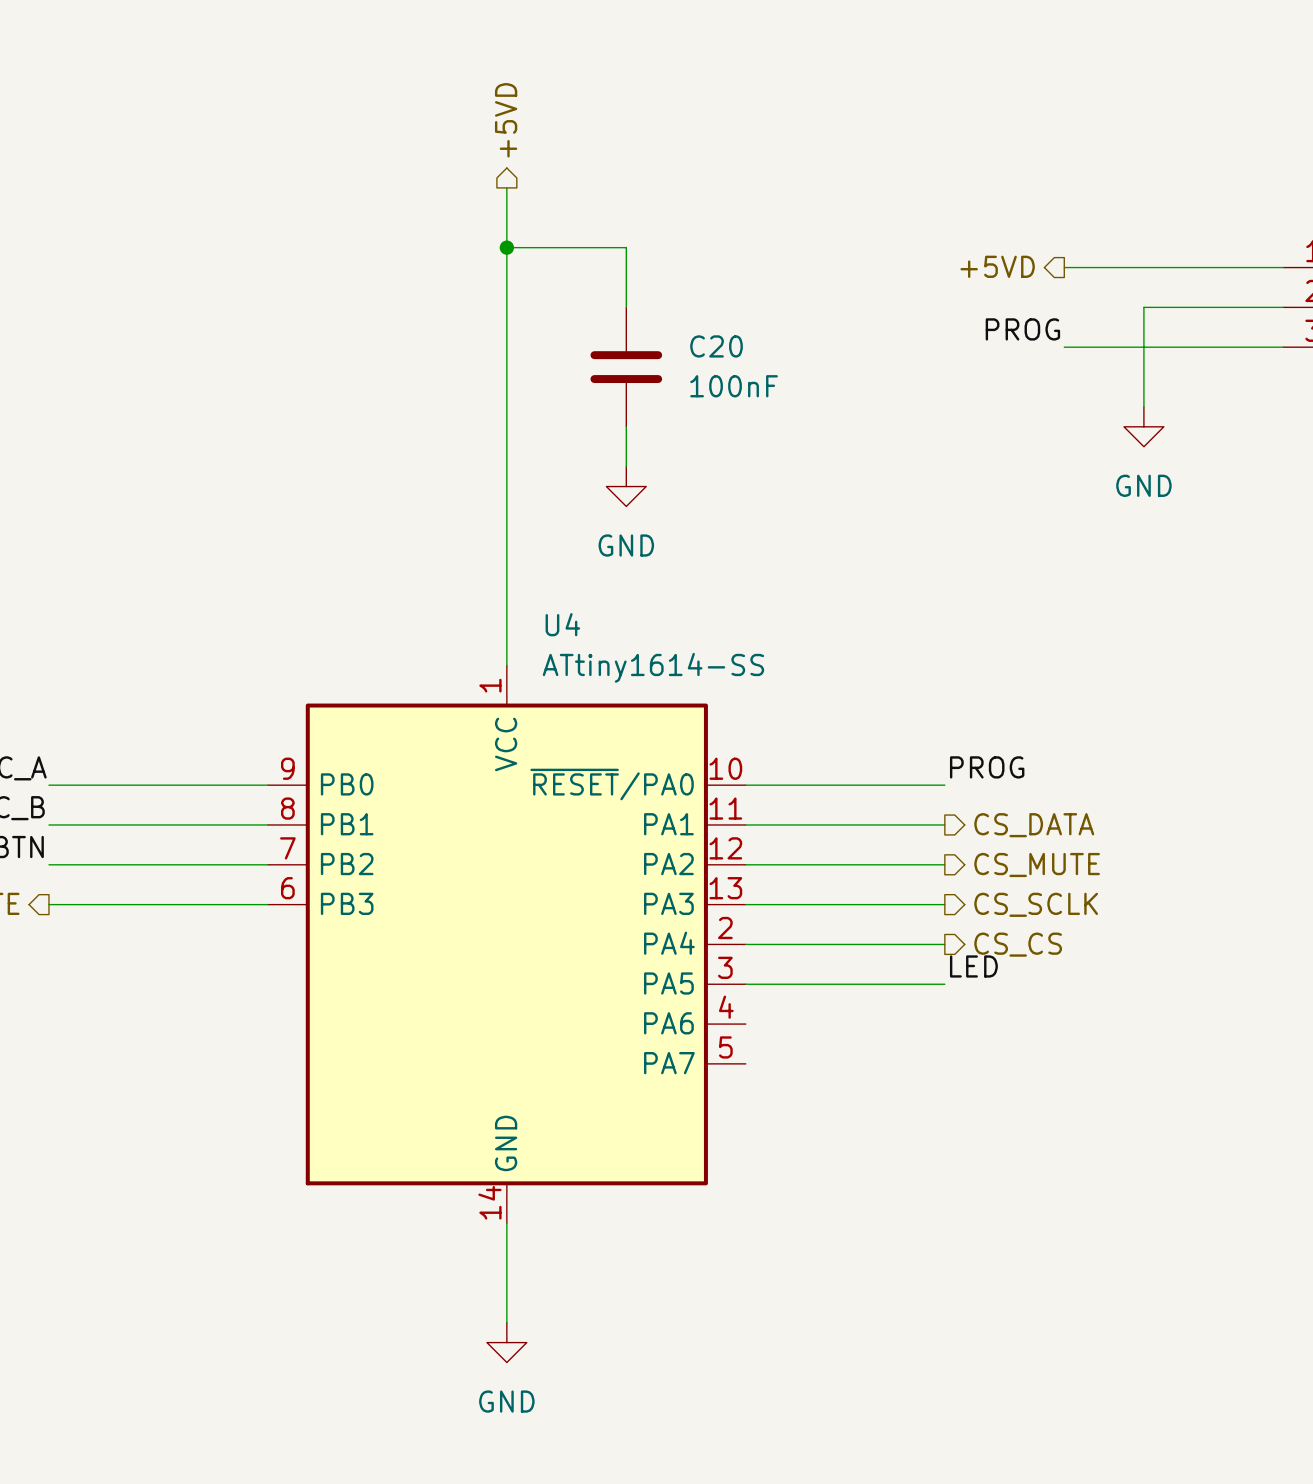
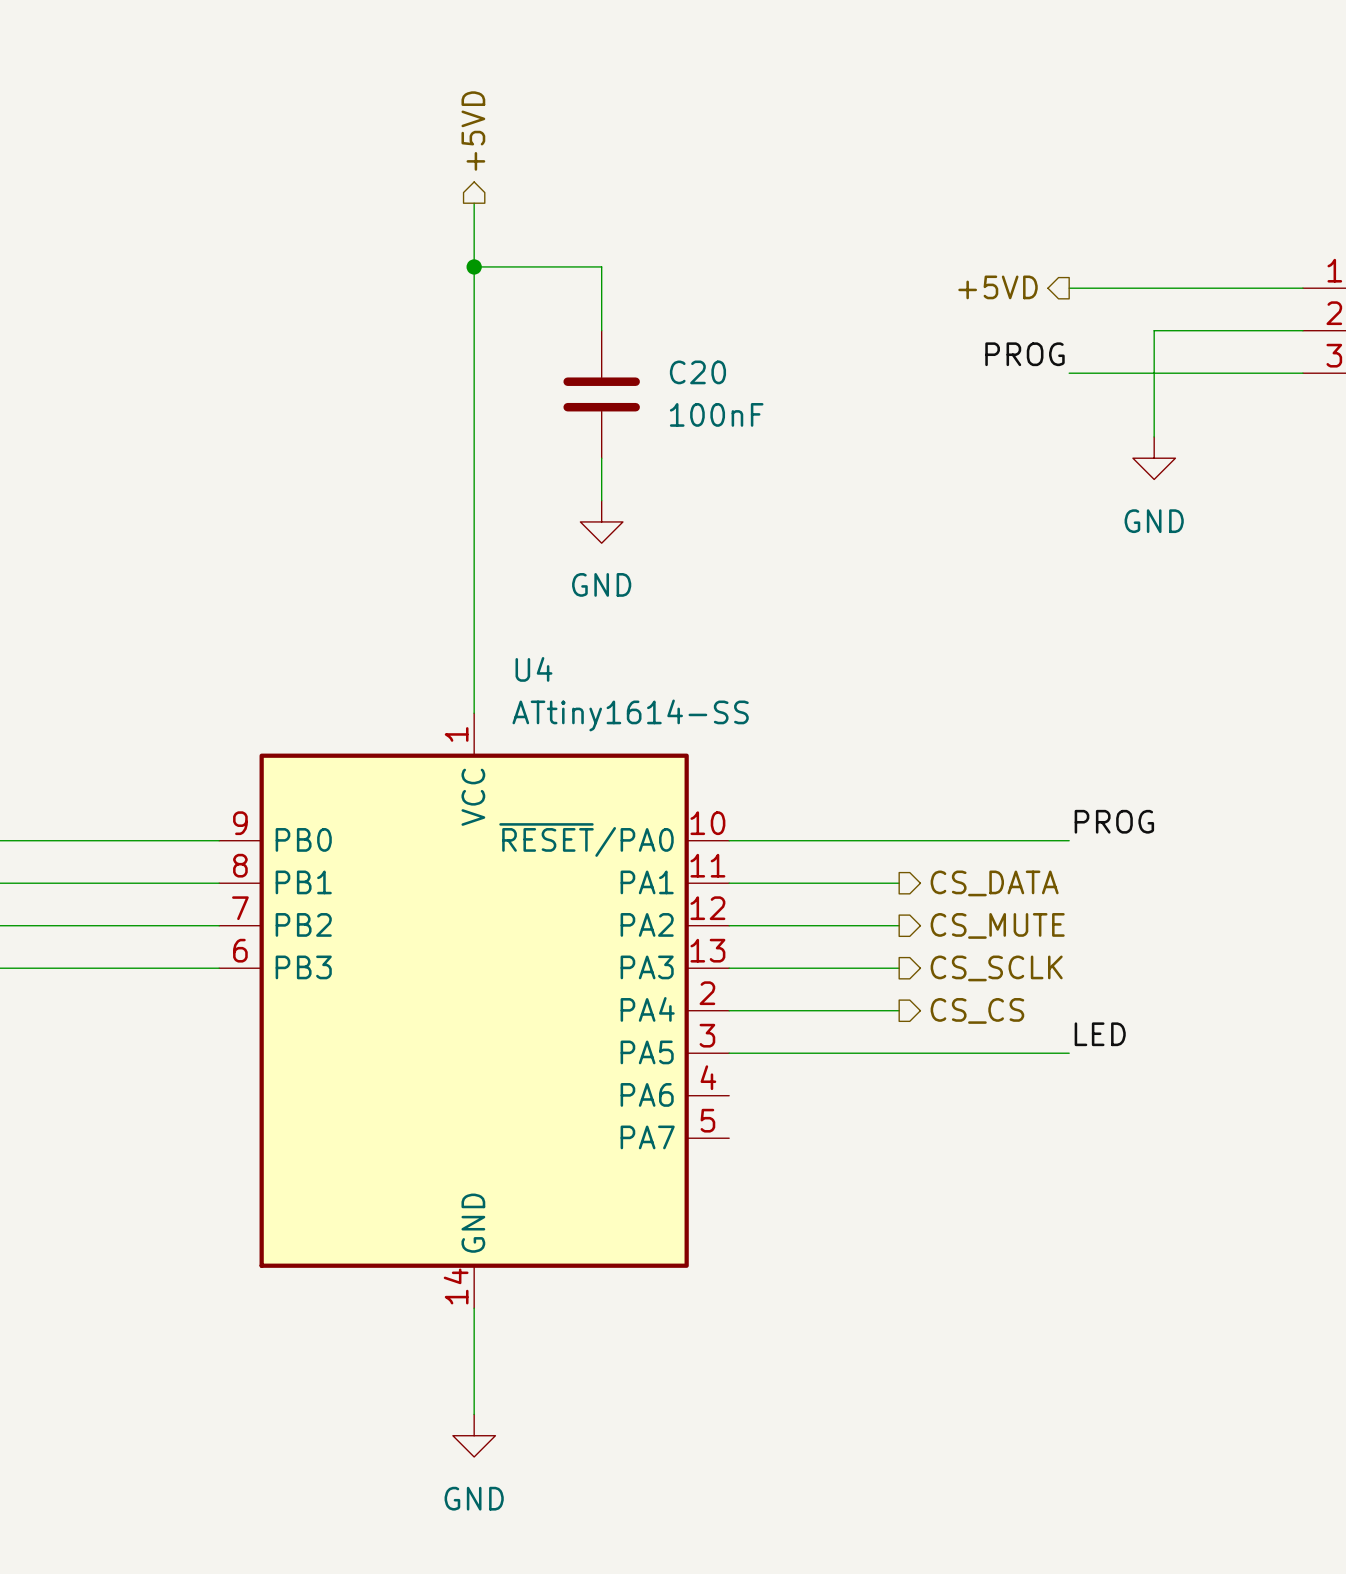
label position: PROG (987, 767) -> PROG (1114, 821)
wire: none -> (941, 840) (1069, 840)
wire: (905, 824) (944, 824) -> none
hierarchical label position: CS_DATA (1034, 825) -> CS_DATA (994, 883)
wire: (905, 864) (944, 864) -> none
hierarchical label position: CS_MUTE (1037, 865) -> CS_MUTE (997, 925)
wire: (905, 904) (944, 904) -> none
hierarchical label position: CS_SCLK (1036, 904) -> CS_SCLK (996, 968)
wire: (905, 944) (944, 944) -> none
hierarchical label position: CS_CS (1018, 944) -> CS_CS (977, 1010)
label position: LED (973, 966) -> LED (1100, 1034)
wire: none -> (941, 1053) (1069, 1053)

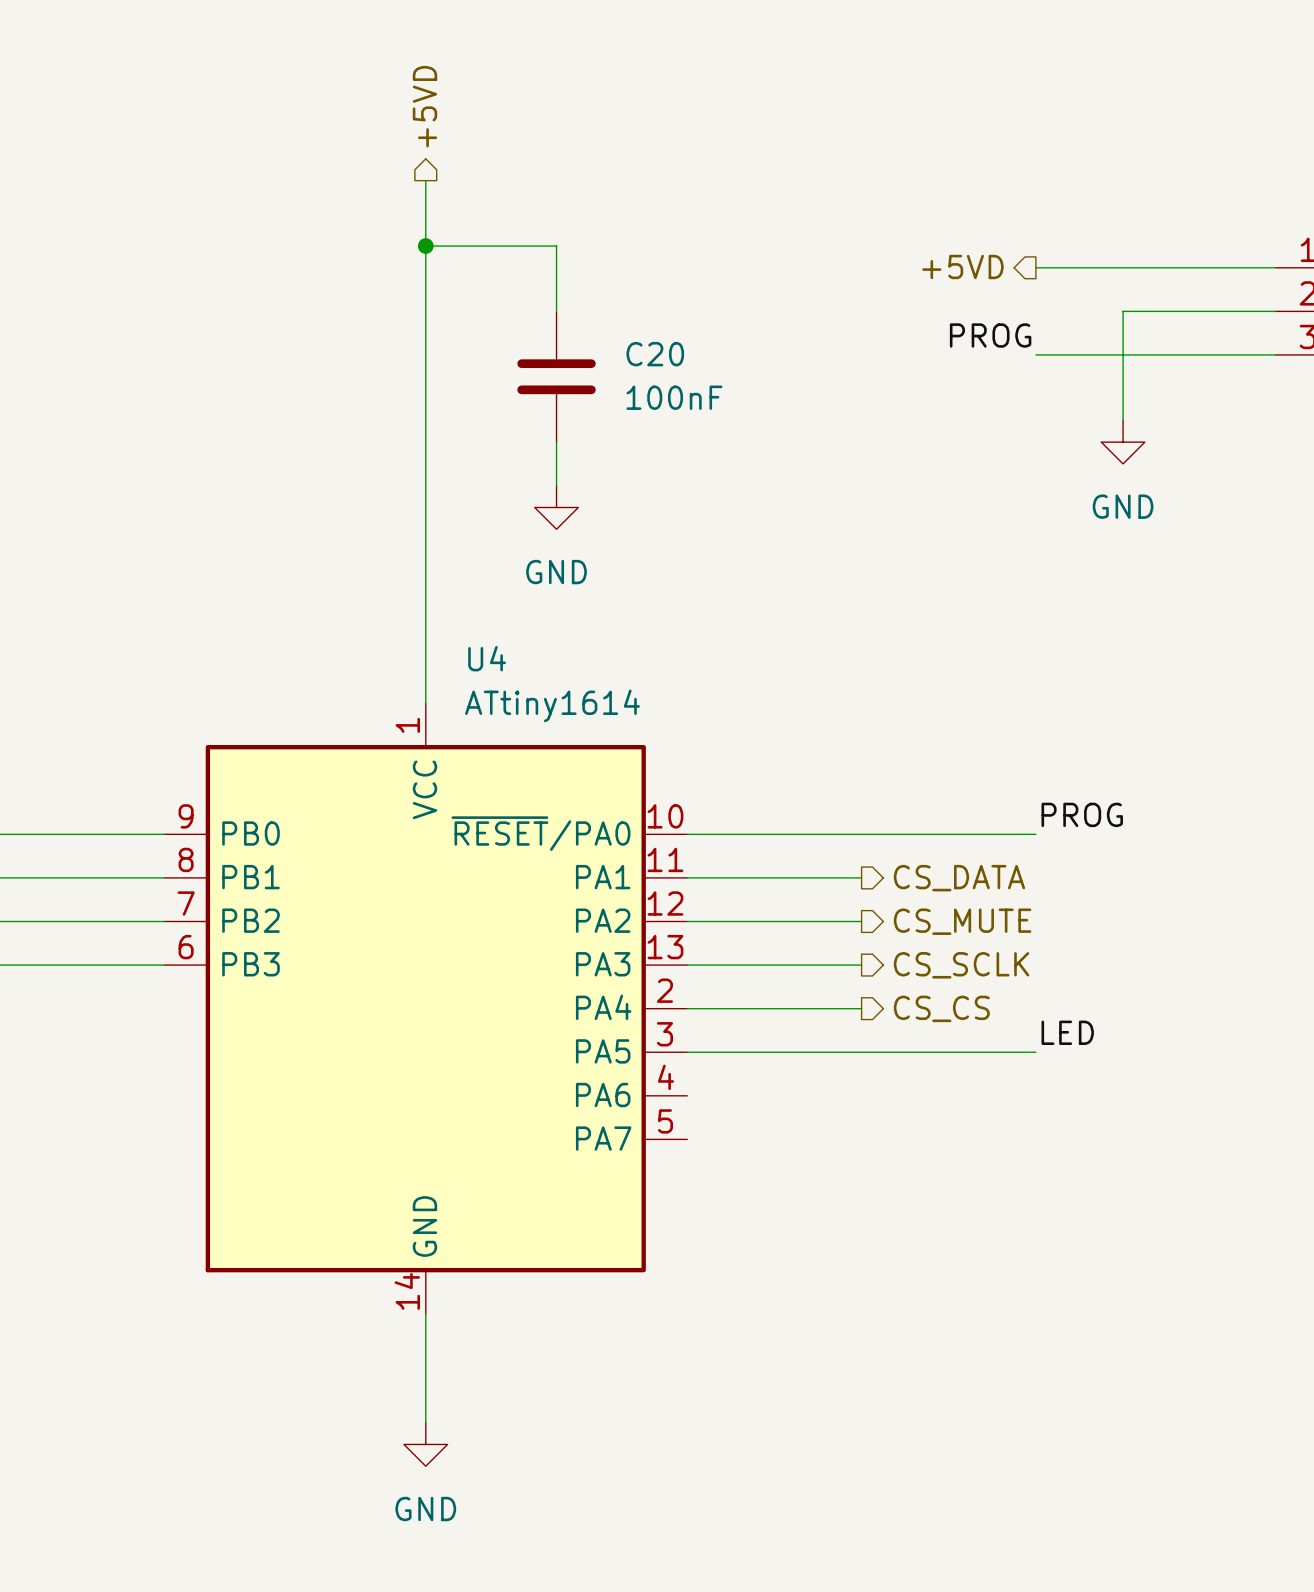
U4 value: ATtiny1614-SS (630, 715) -> ATtiny1614 (552, 705)

